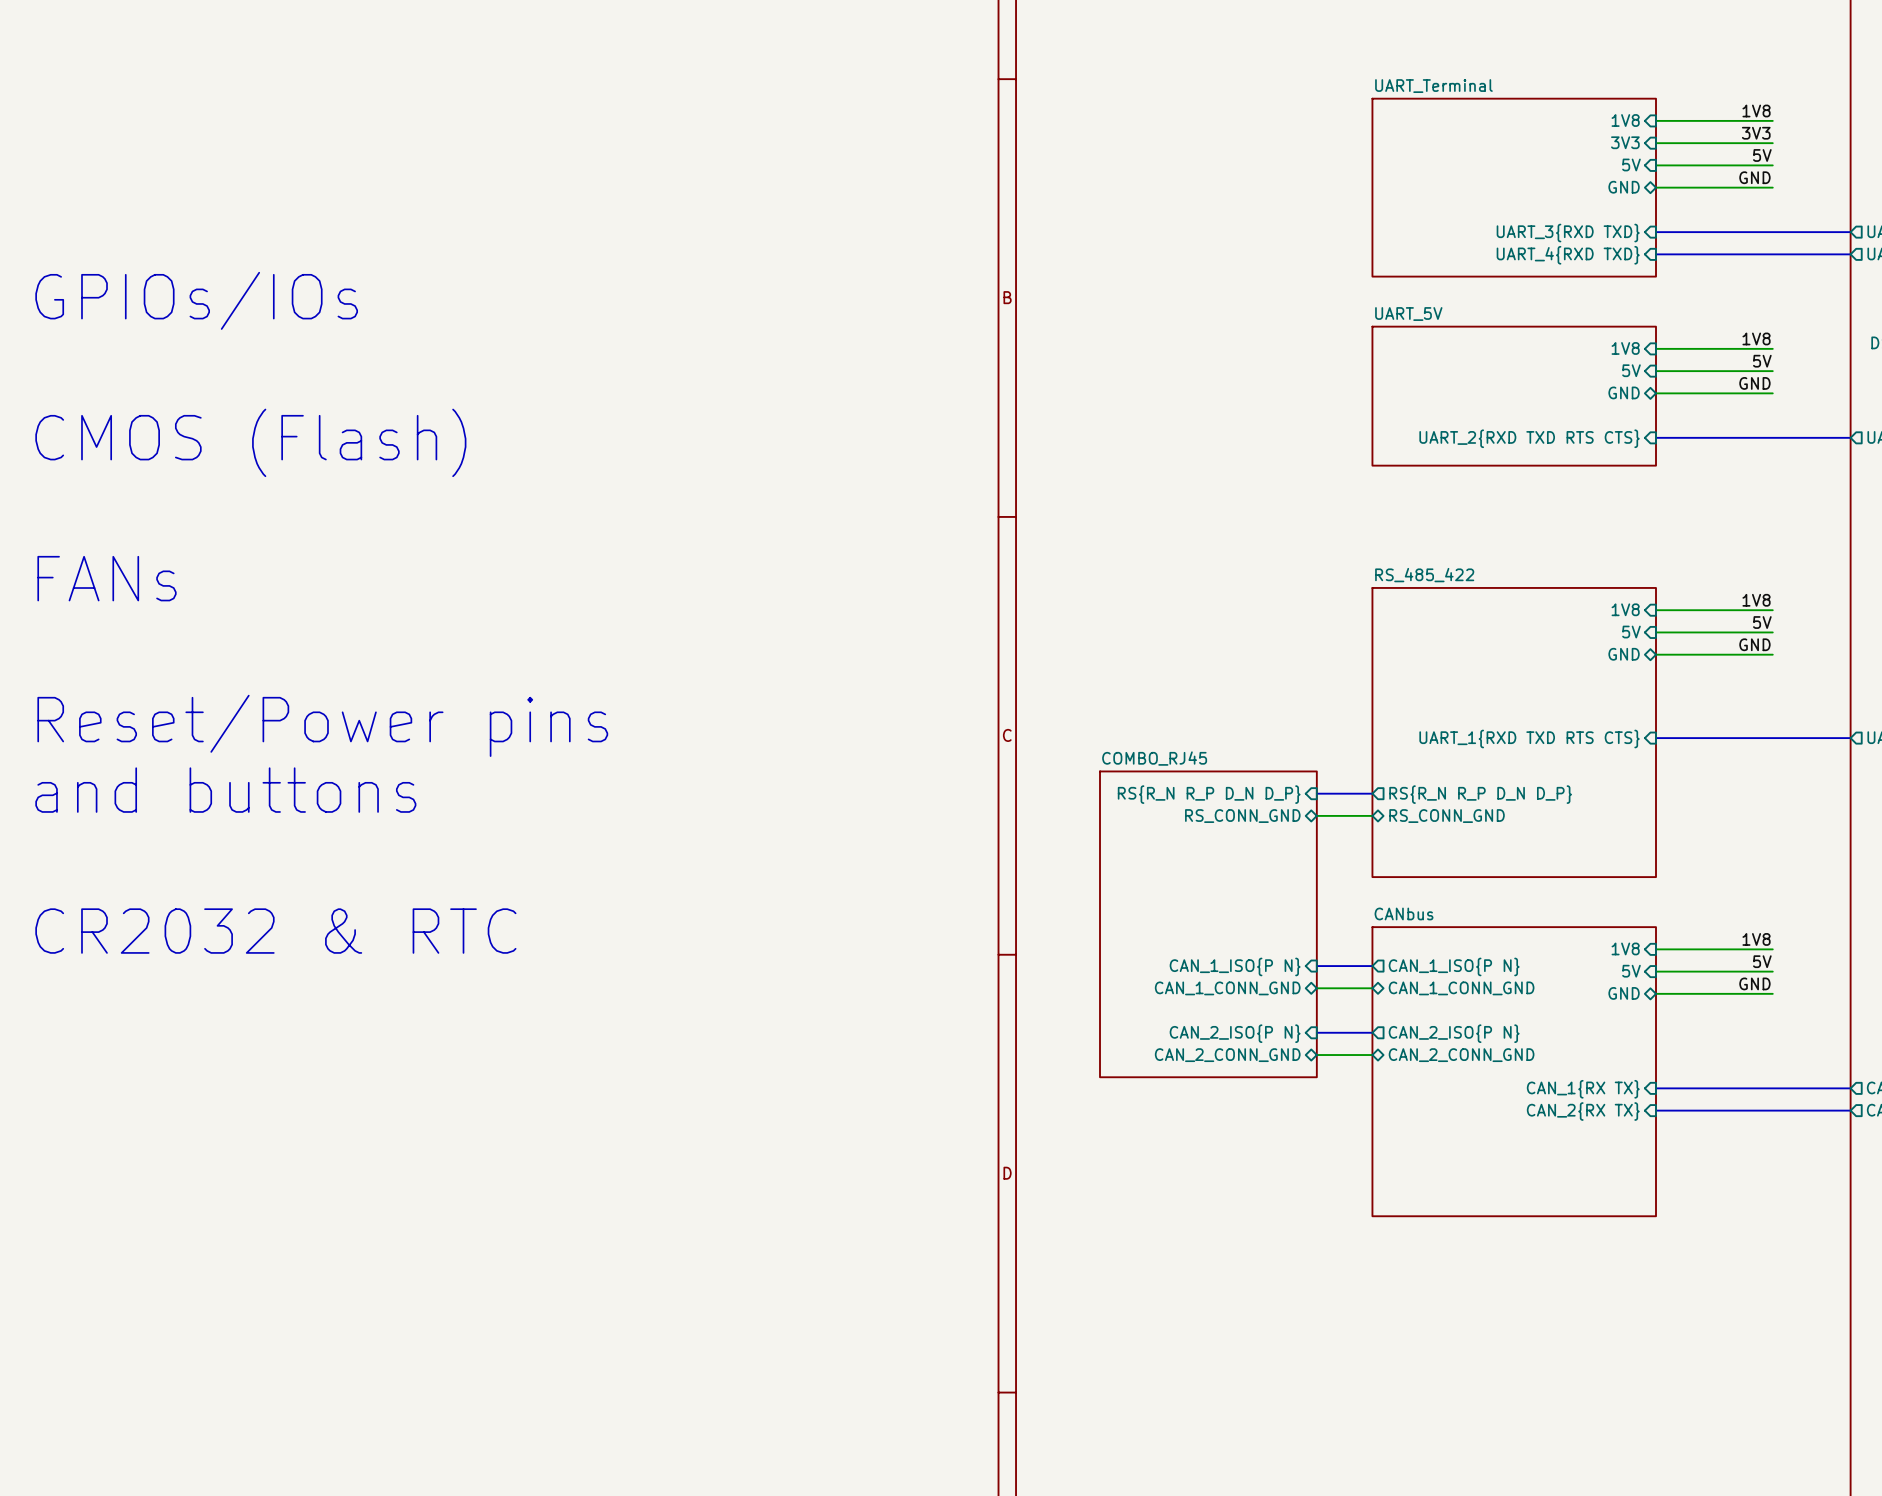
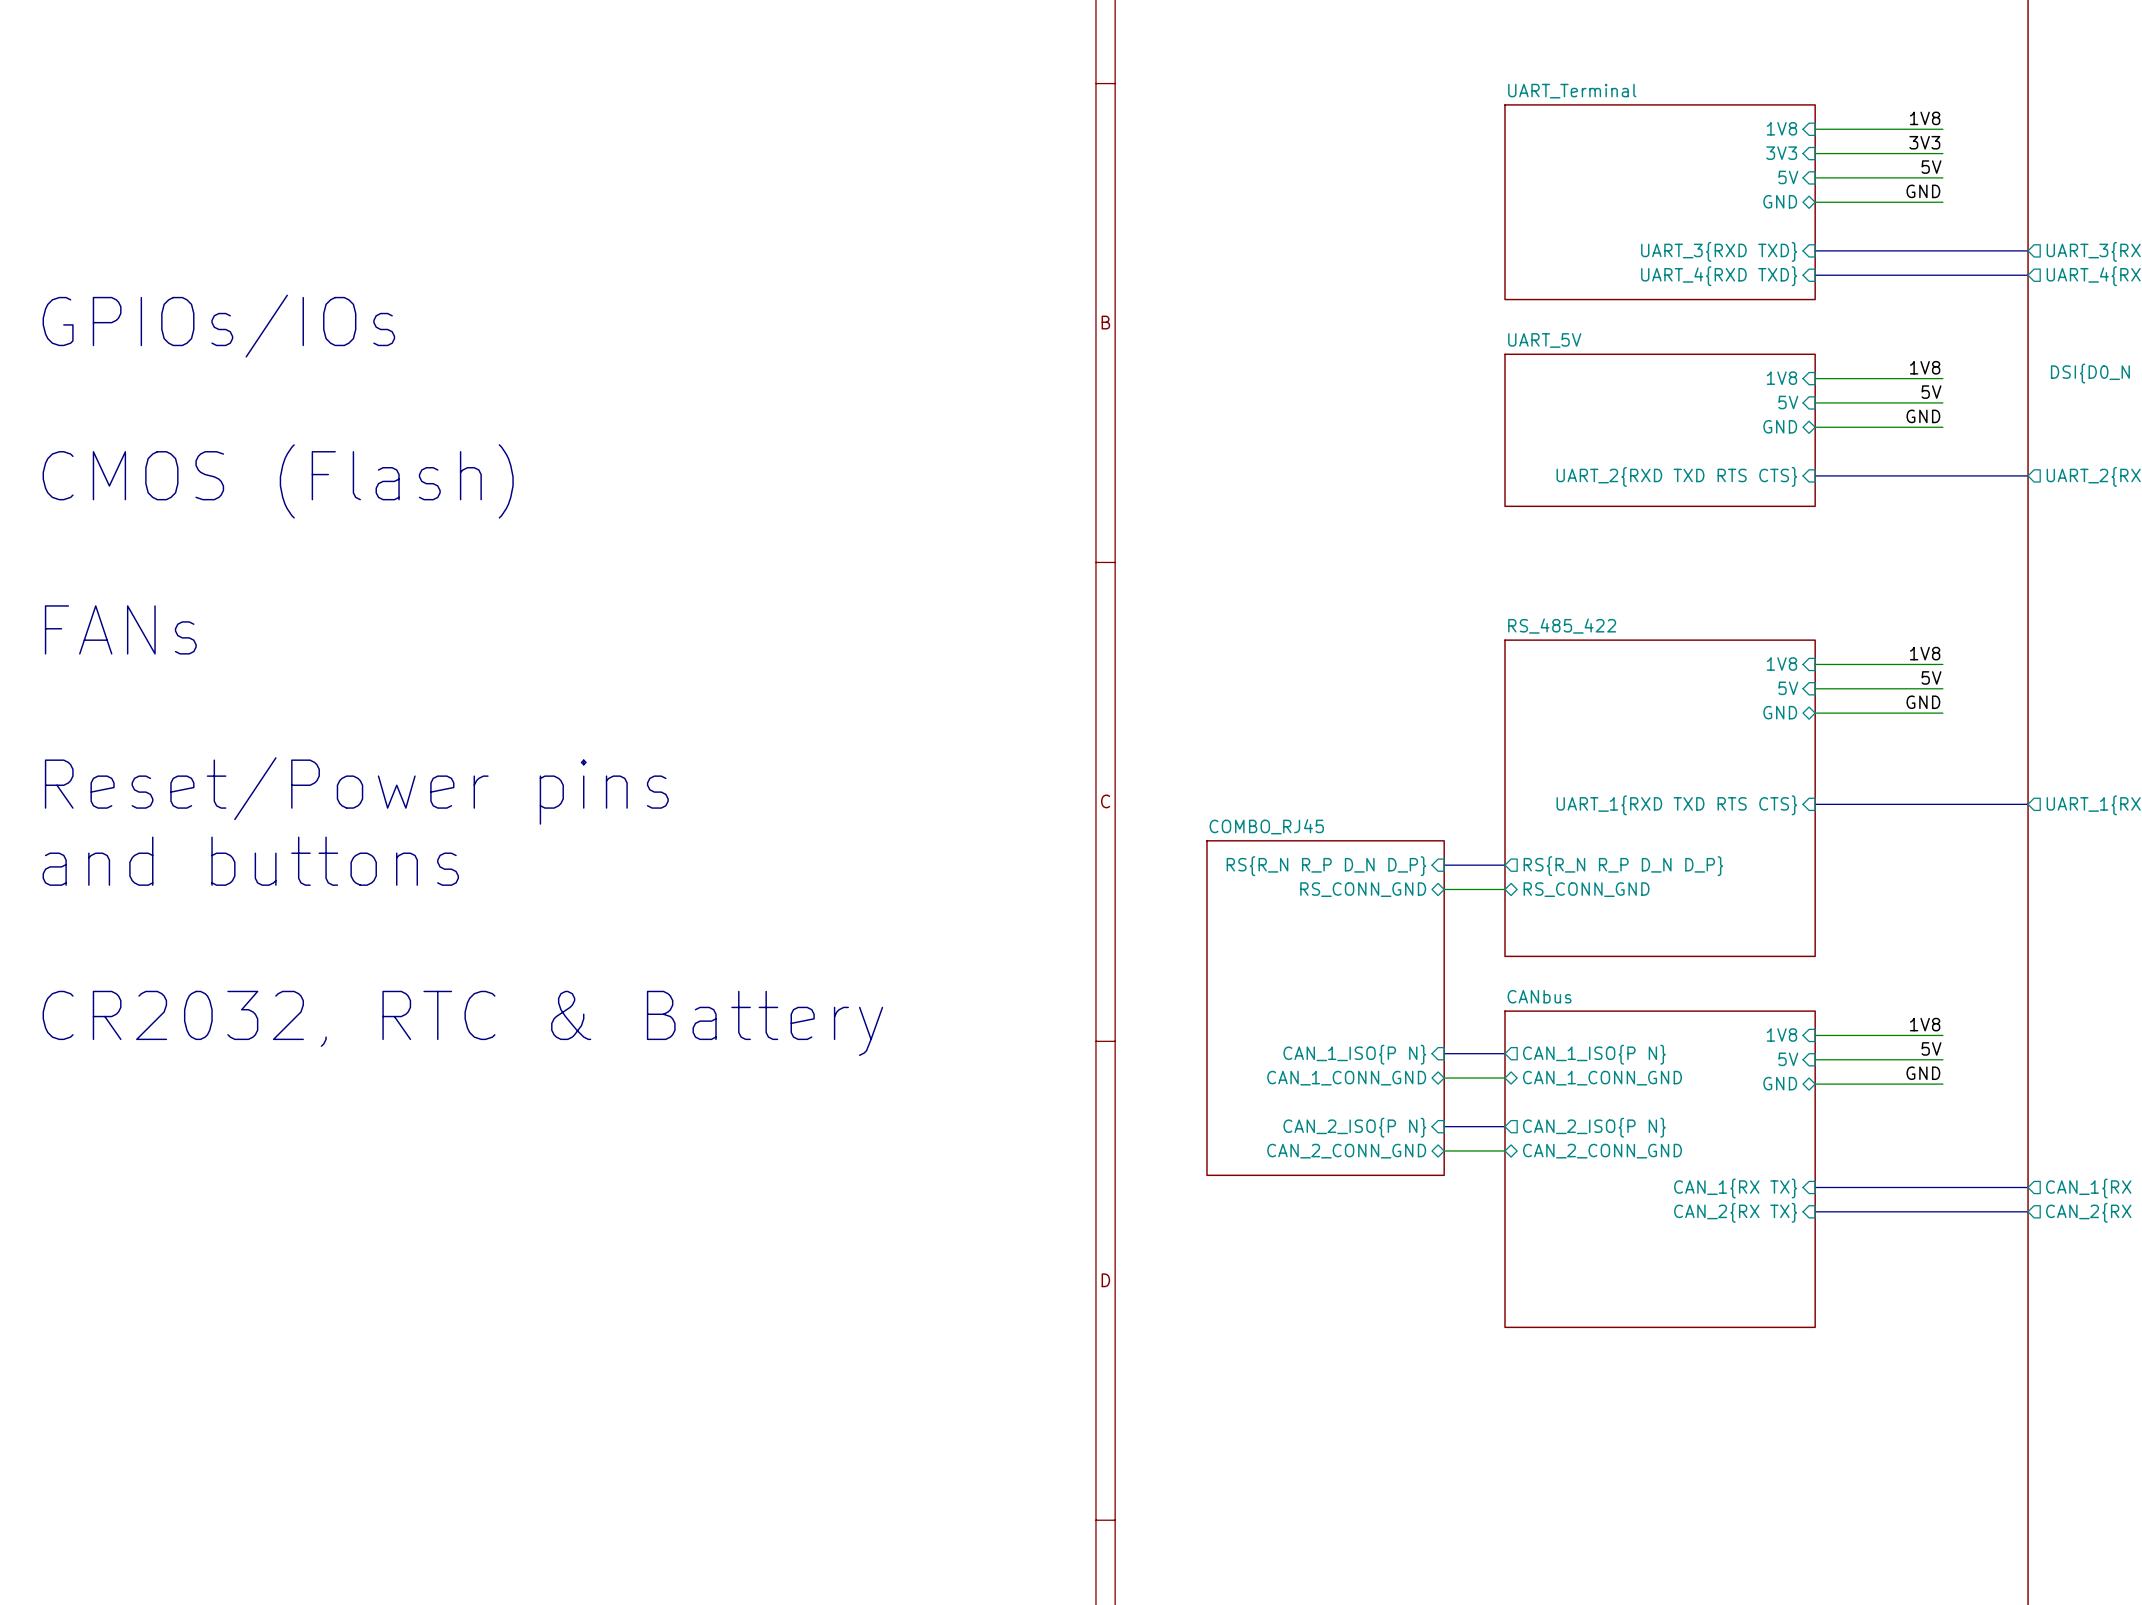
text: CR2032 & RTC (275, 931) -> CR2032, RTC & Battery (462, 1023)

